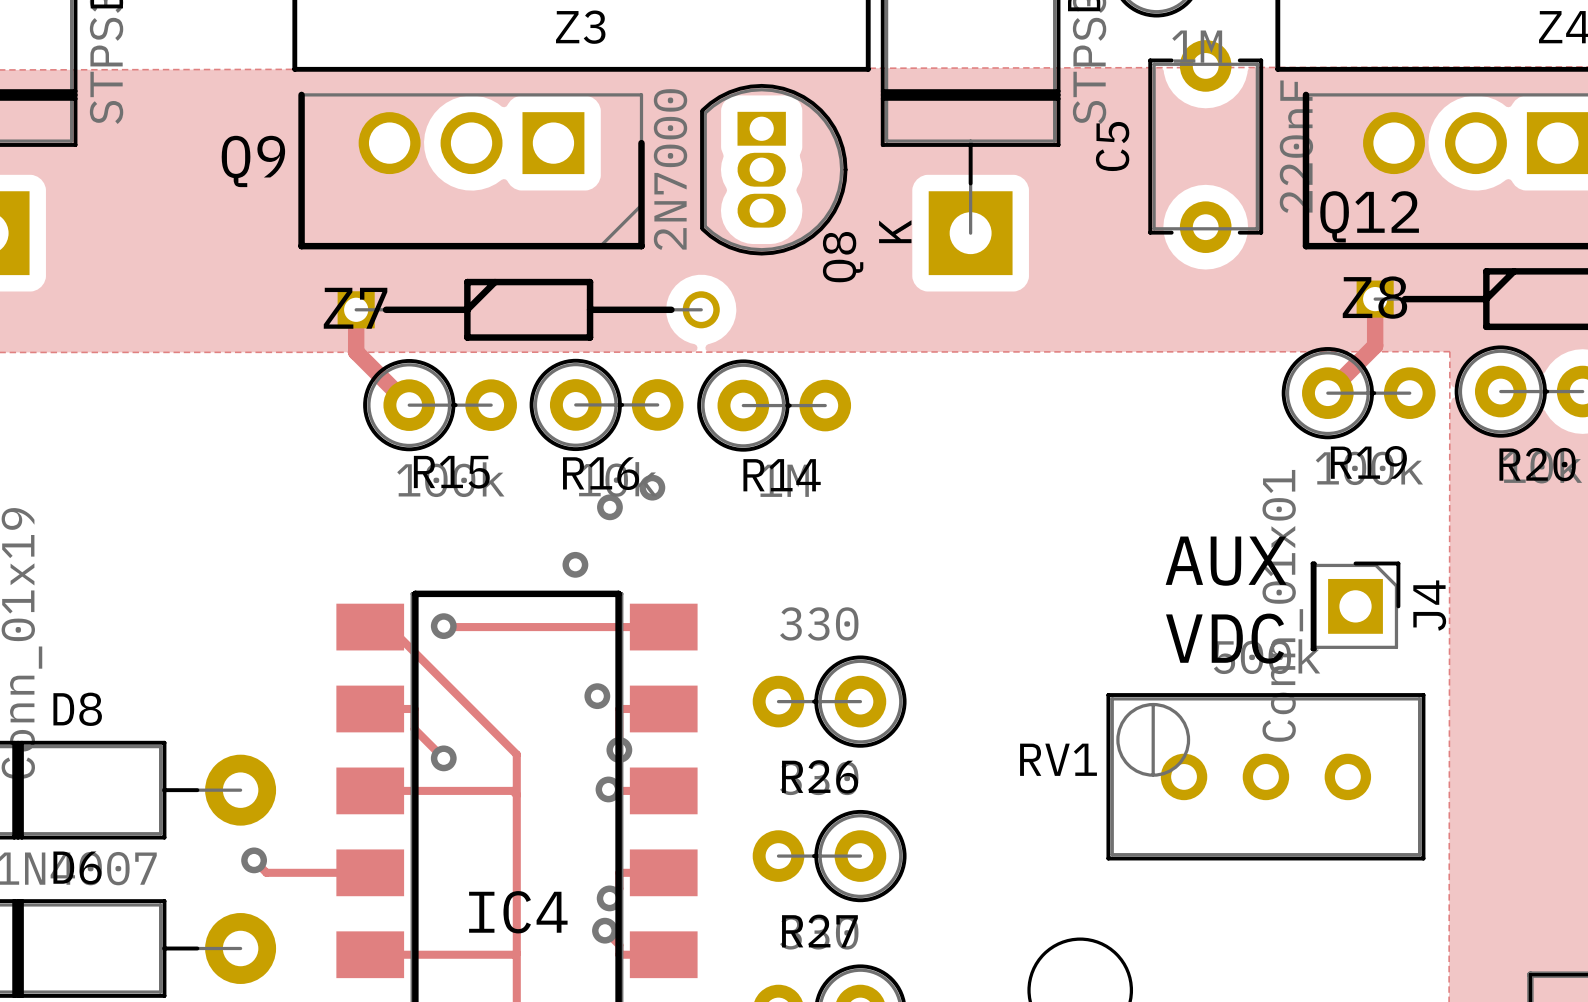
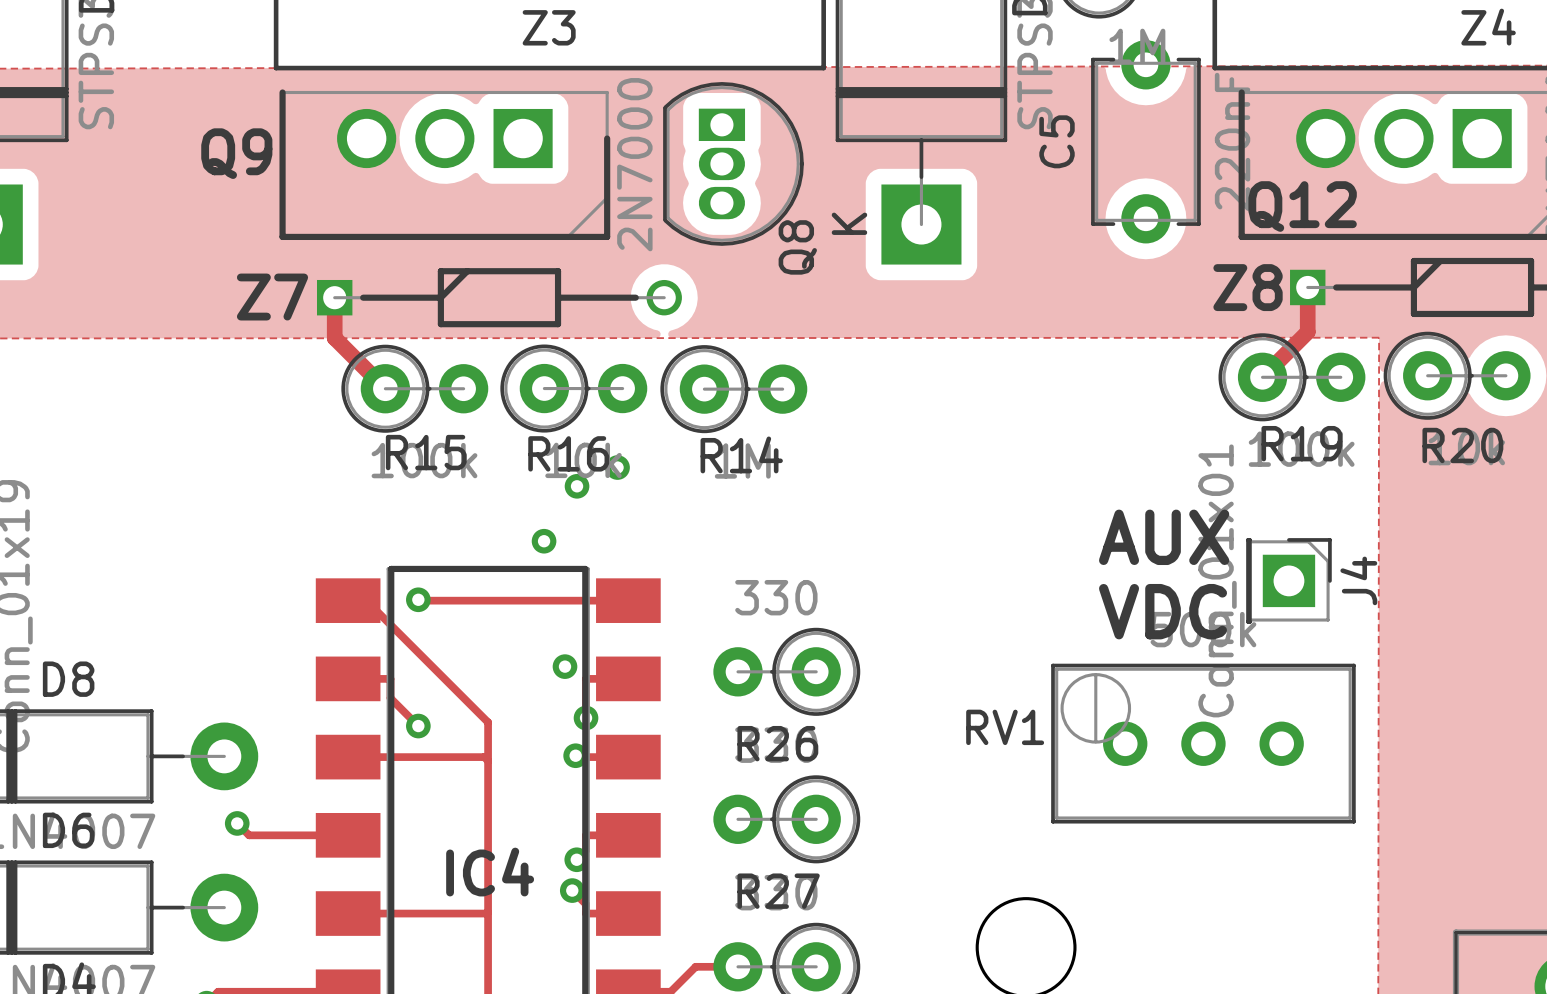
Z8 name position: Z8 (1374, 297) -> Z8 (1248, 287)
Z7 name position: Z7 (355, 308) -> Z7 (272, 297)

